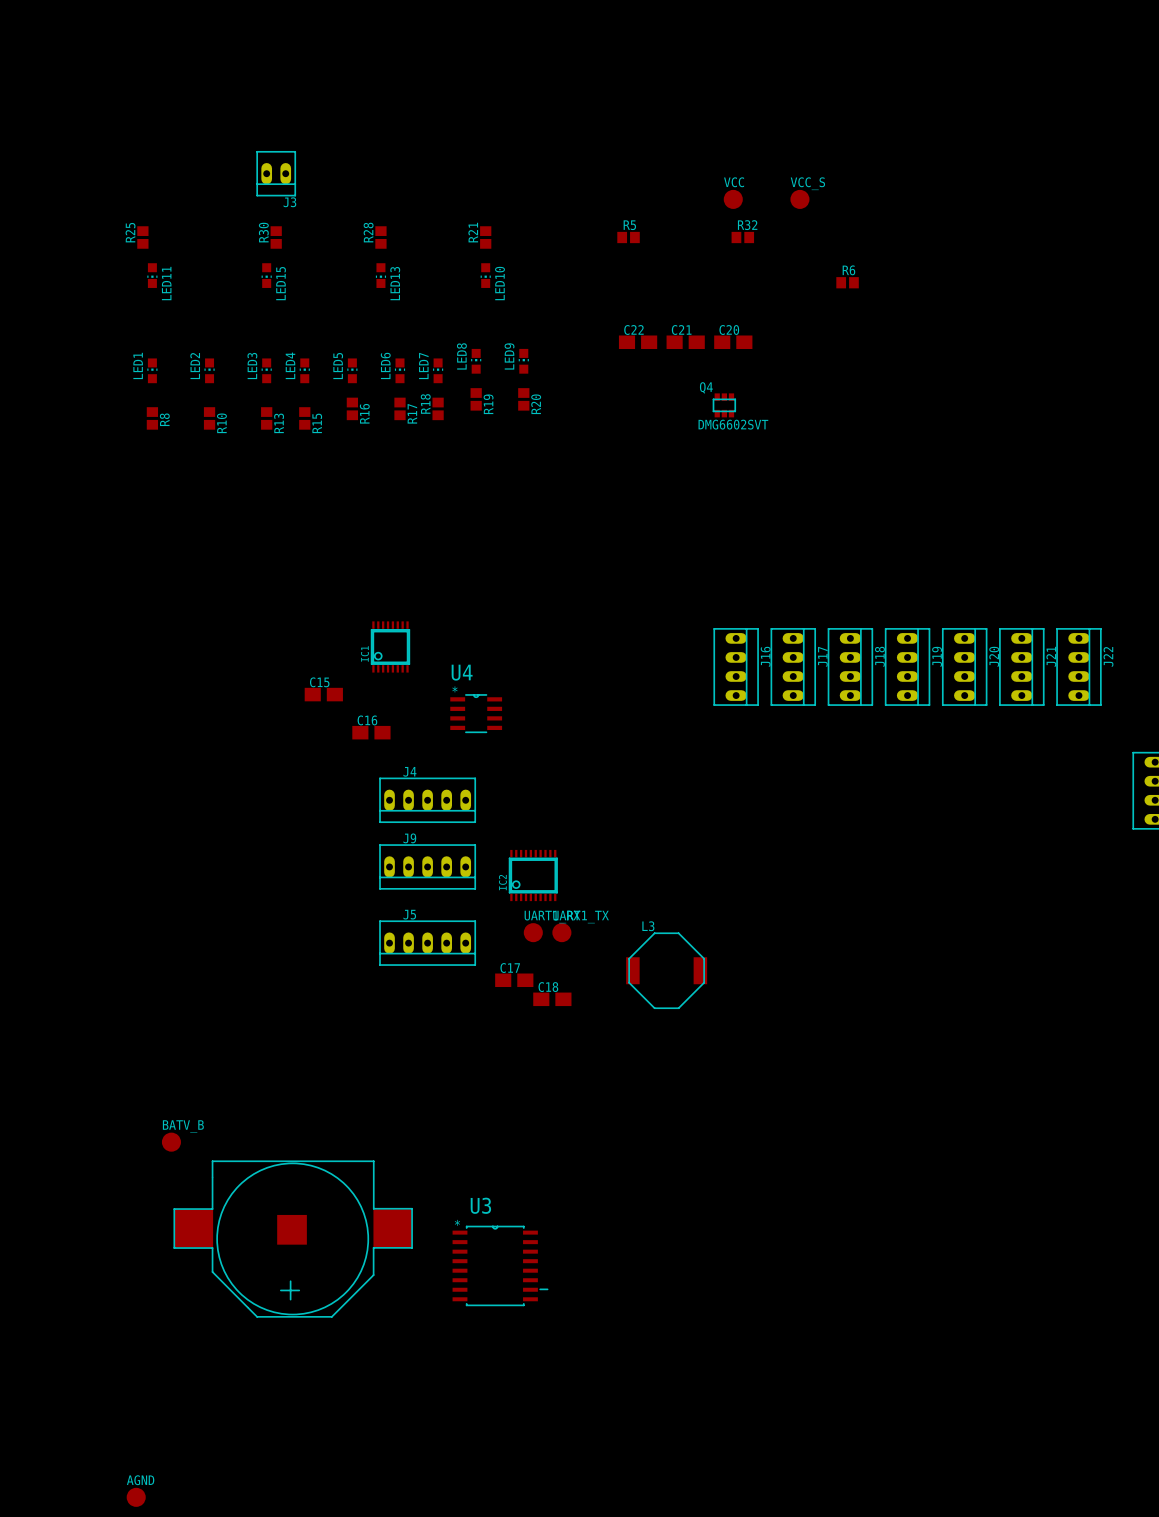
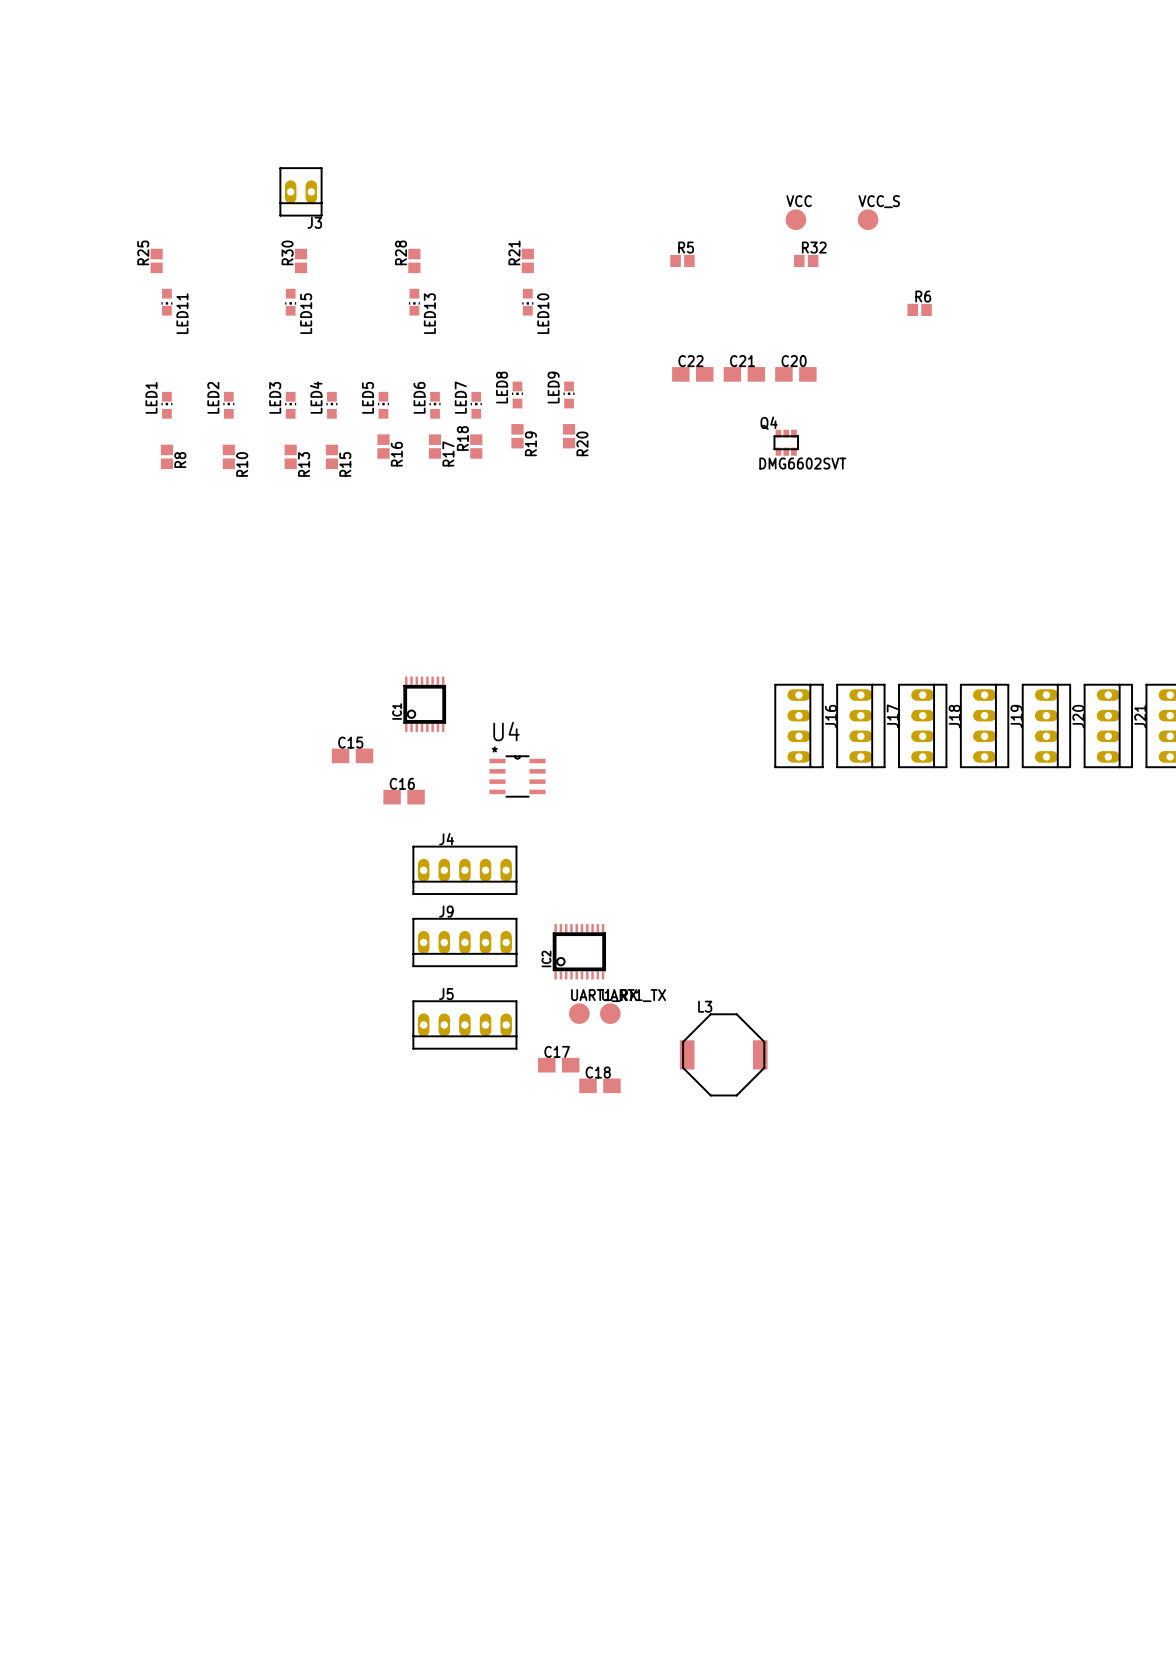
BATV_B: (171, 1142) -> none
part: (293, 1239) -> none
U3: (500, 1265) -> none
AGND: (136, 1497) -> none

